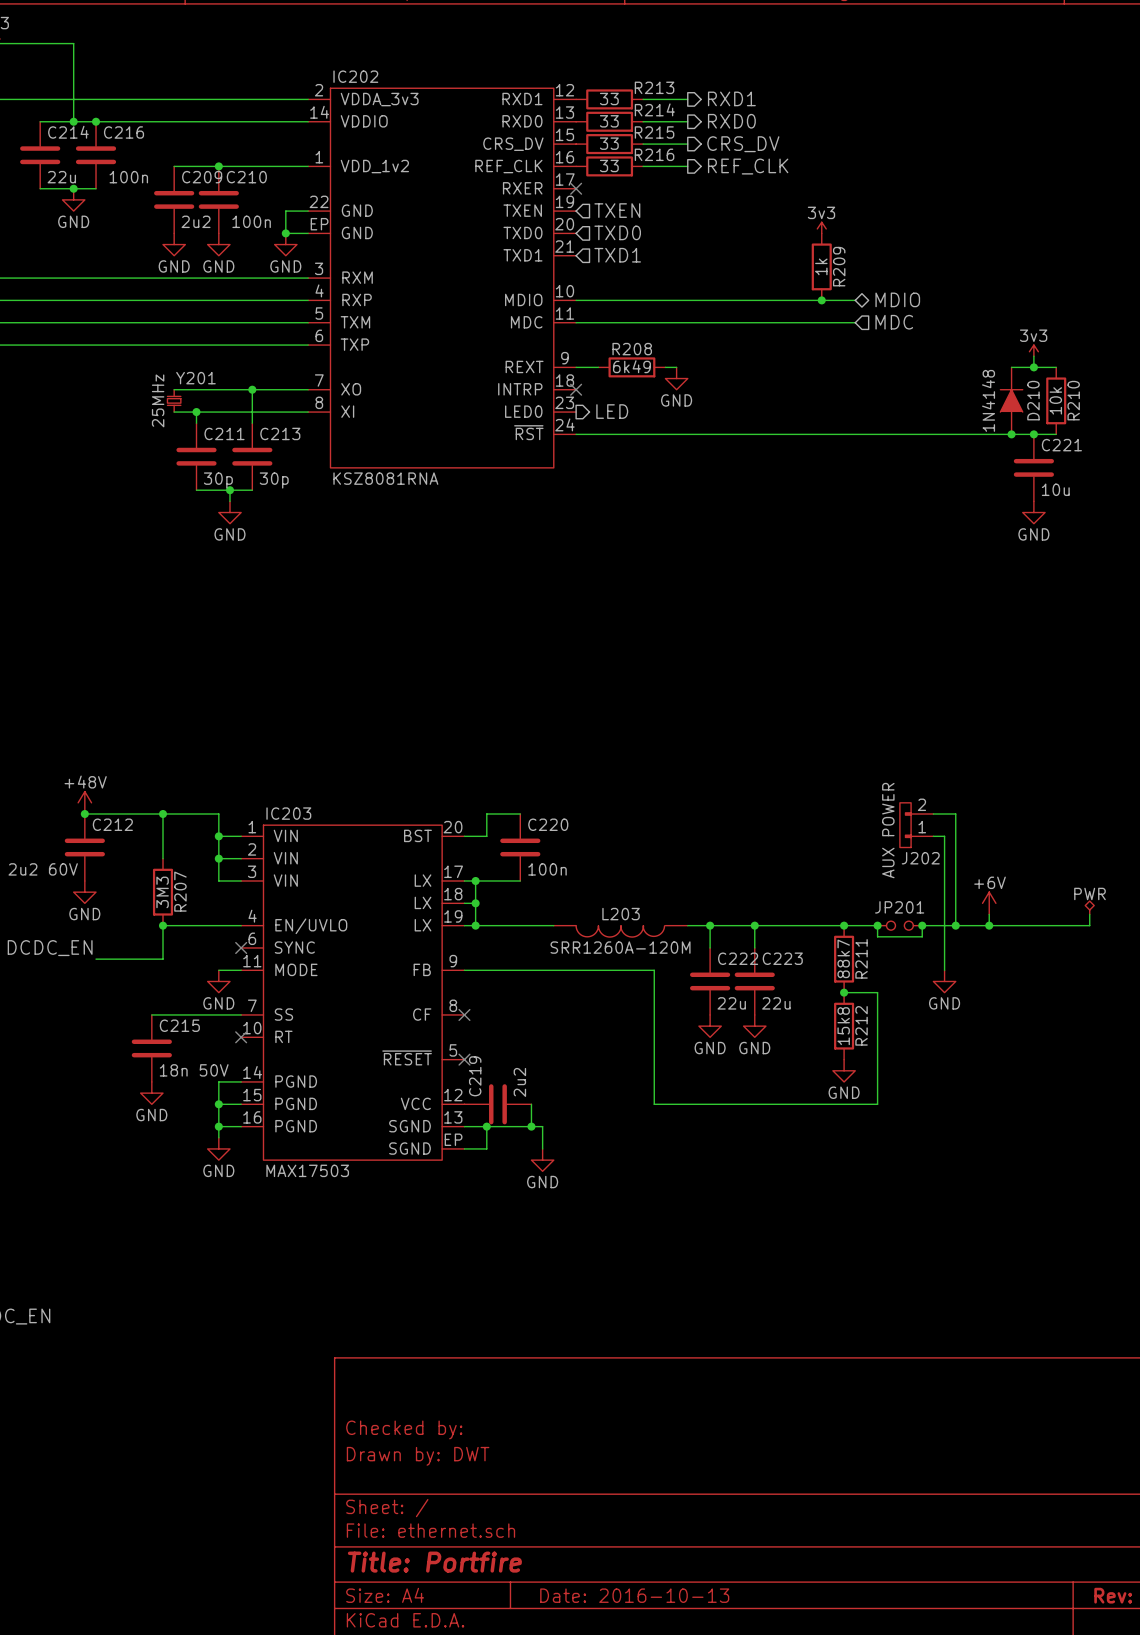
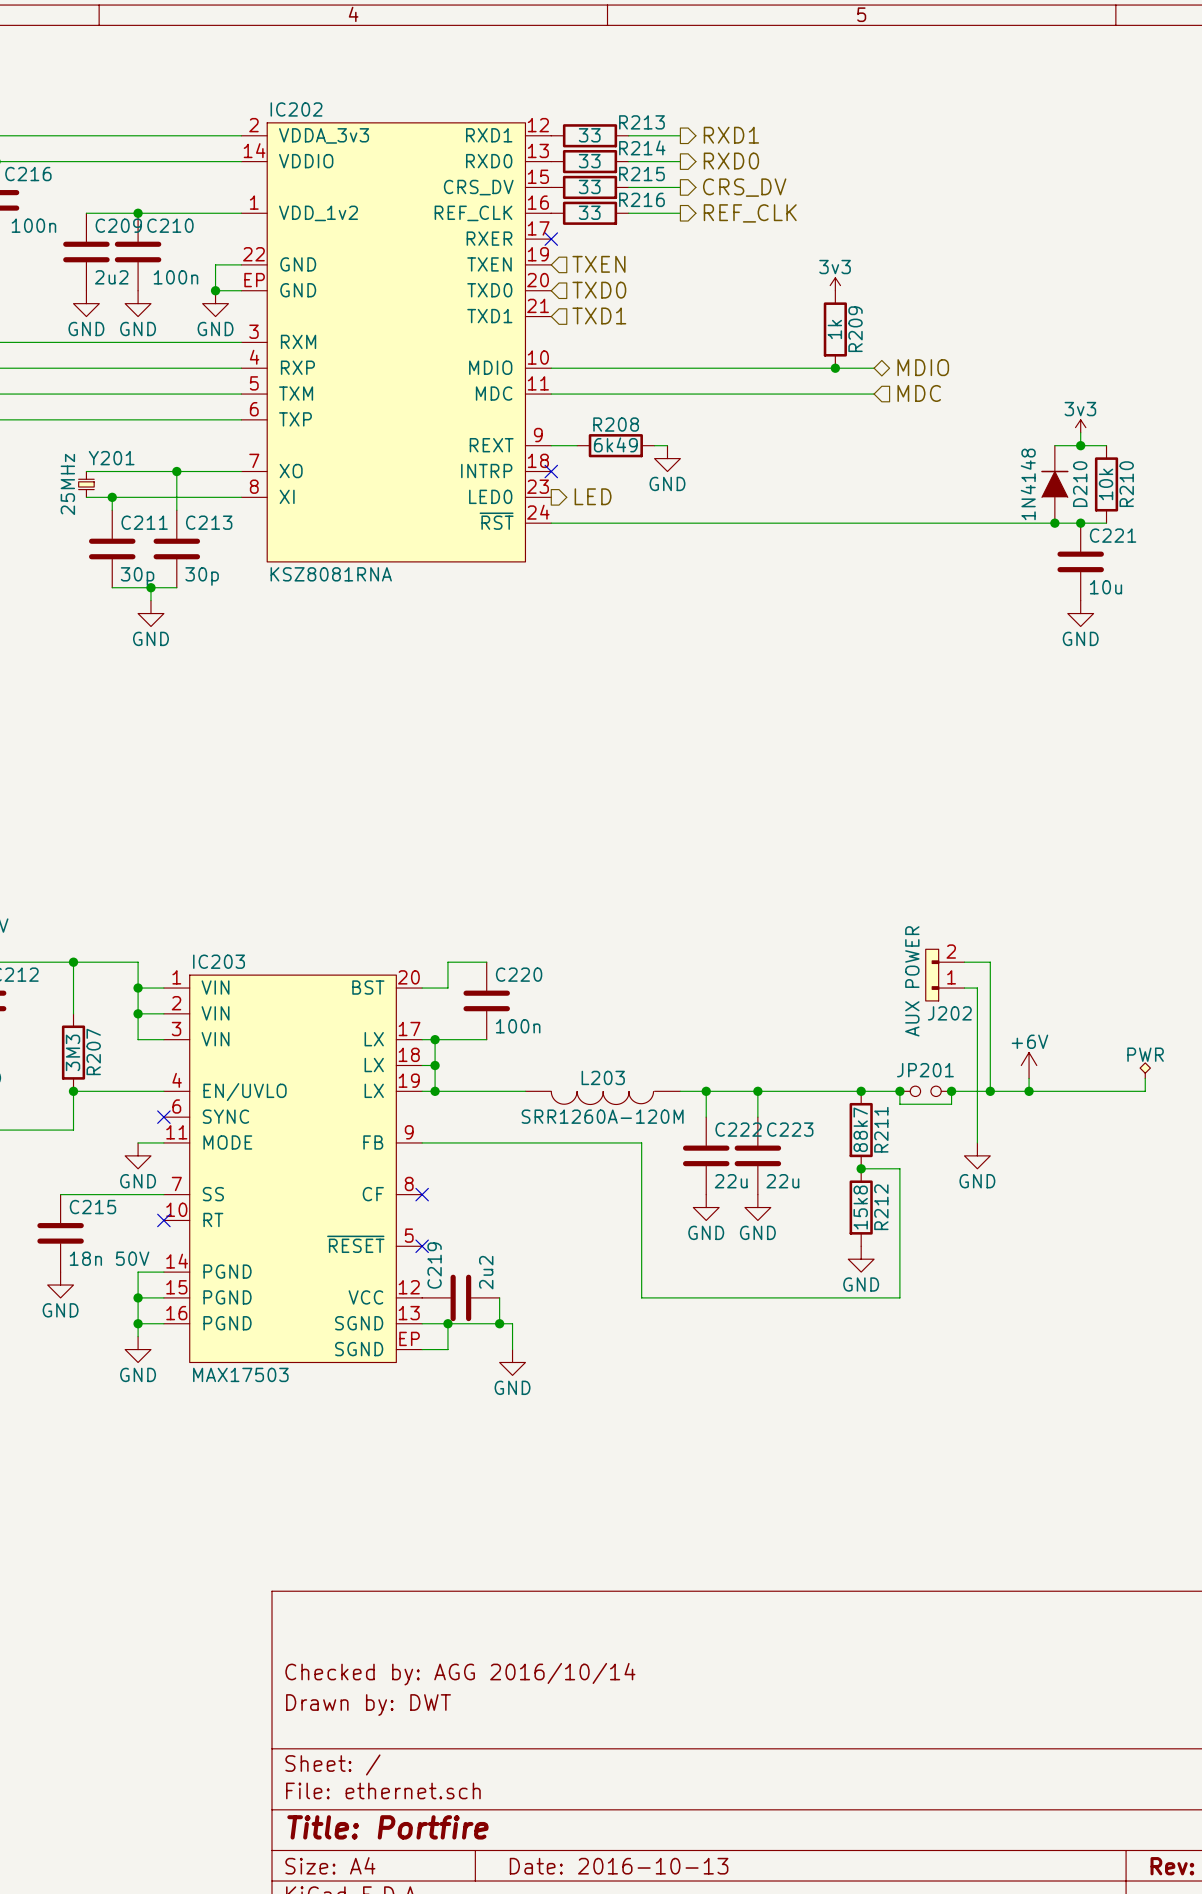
title block: Checked by: (404, 1429) -> Checked by: AGG 2016/10/14 (460, 1674)

